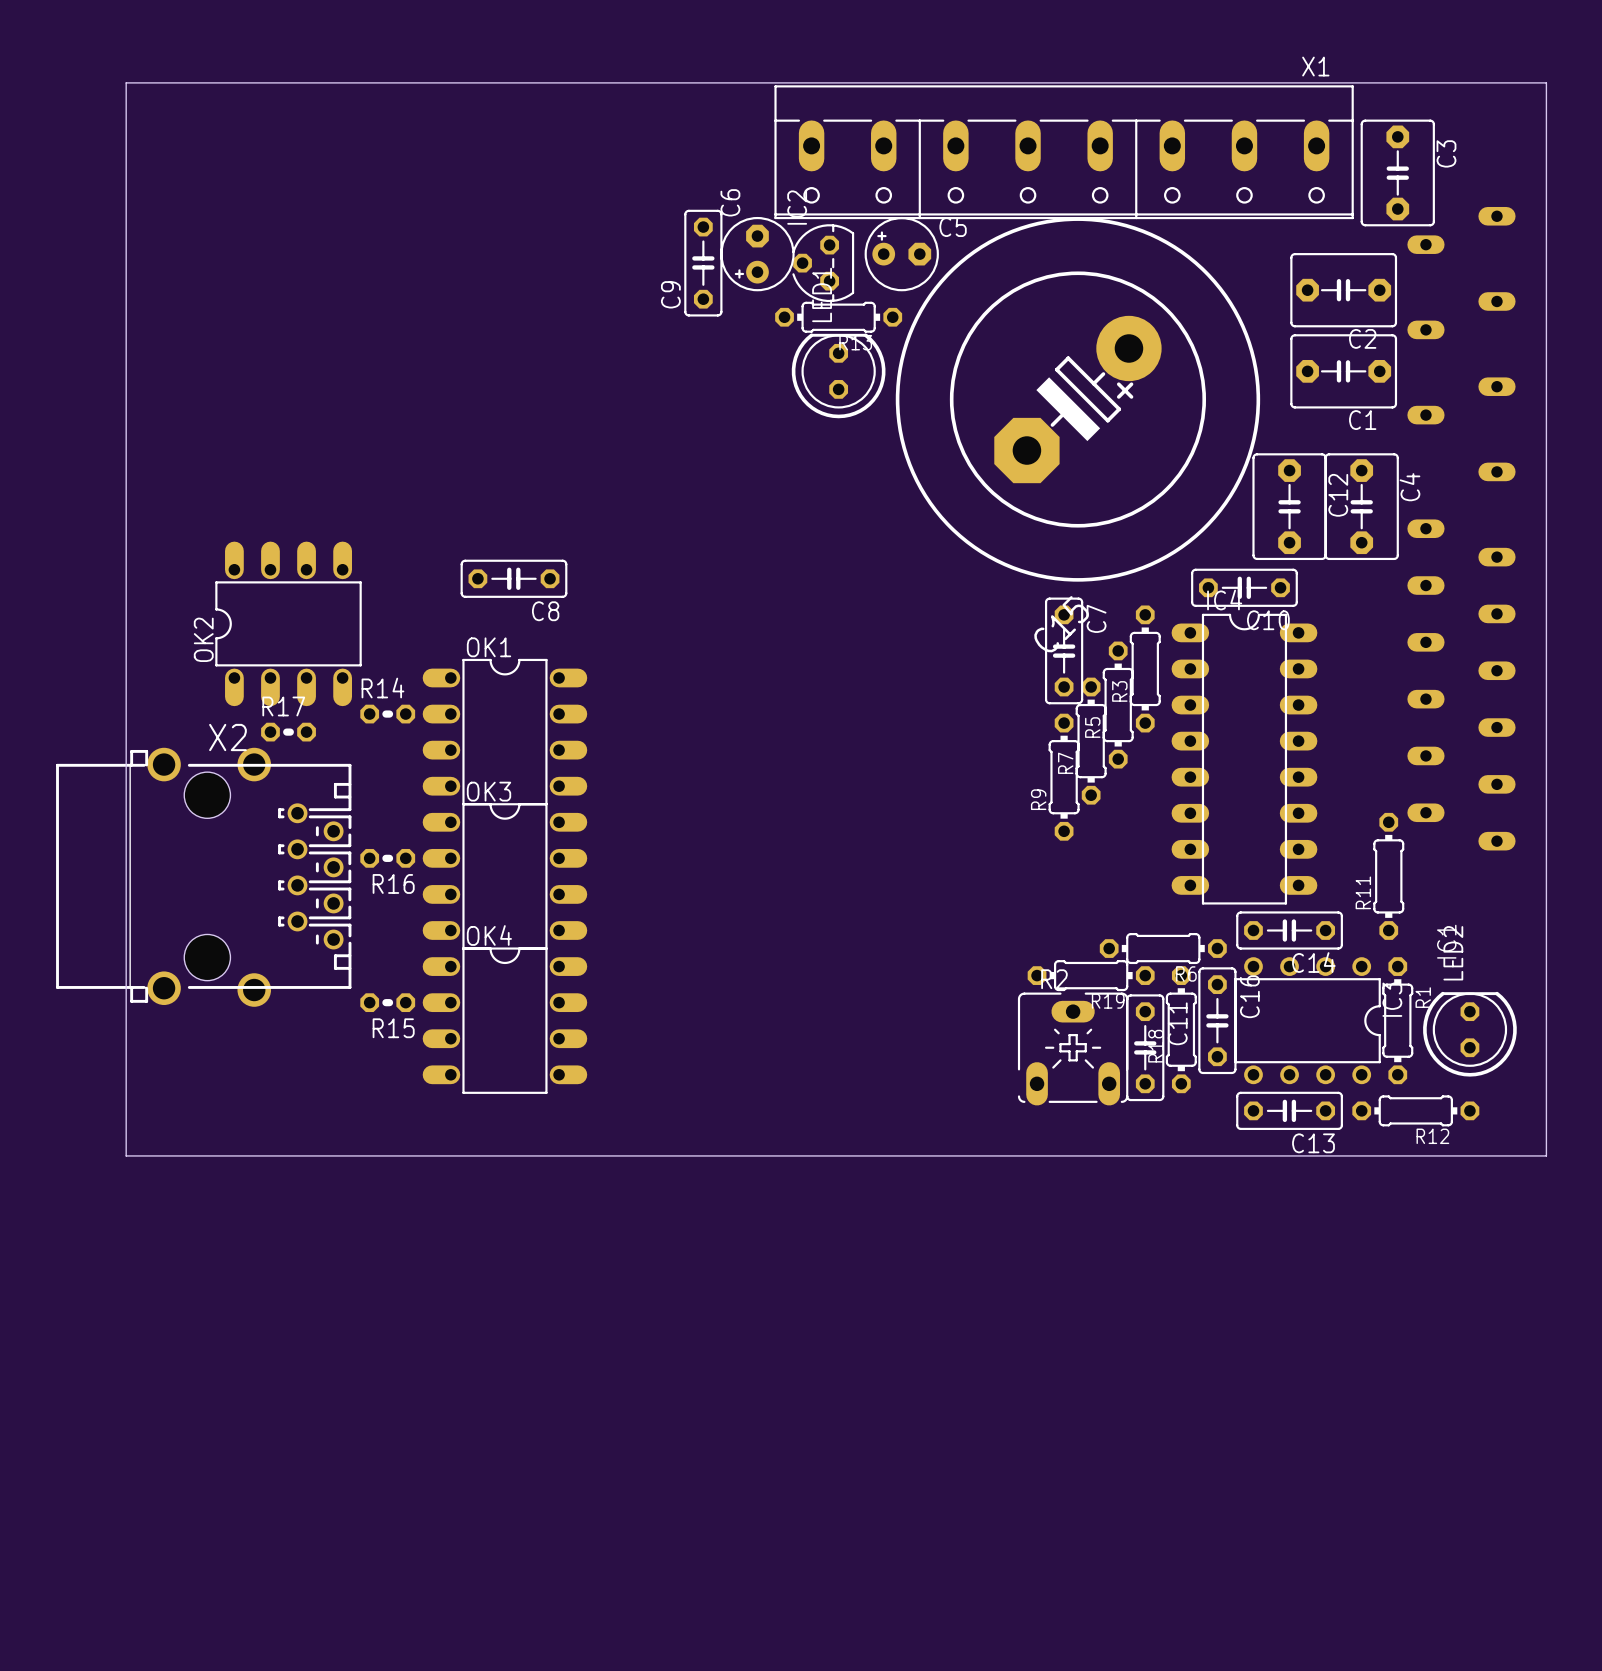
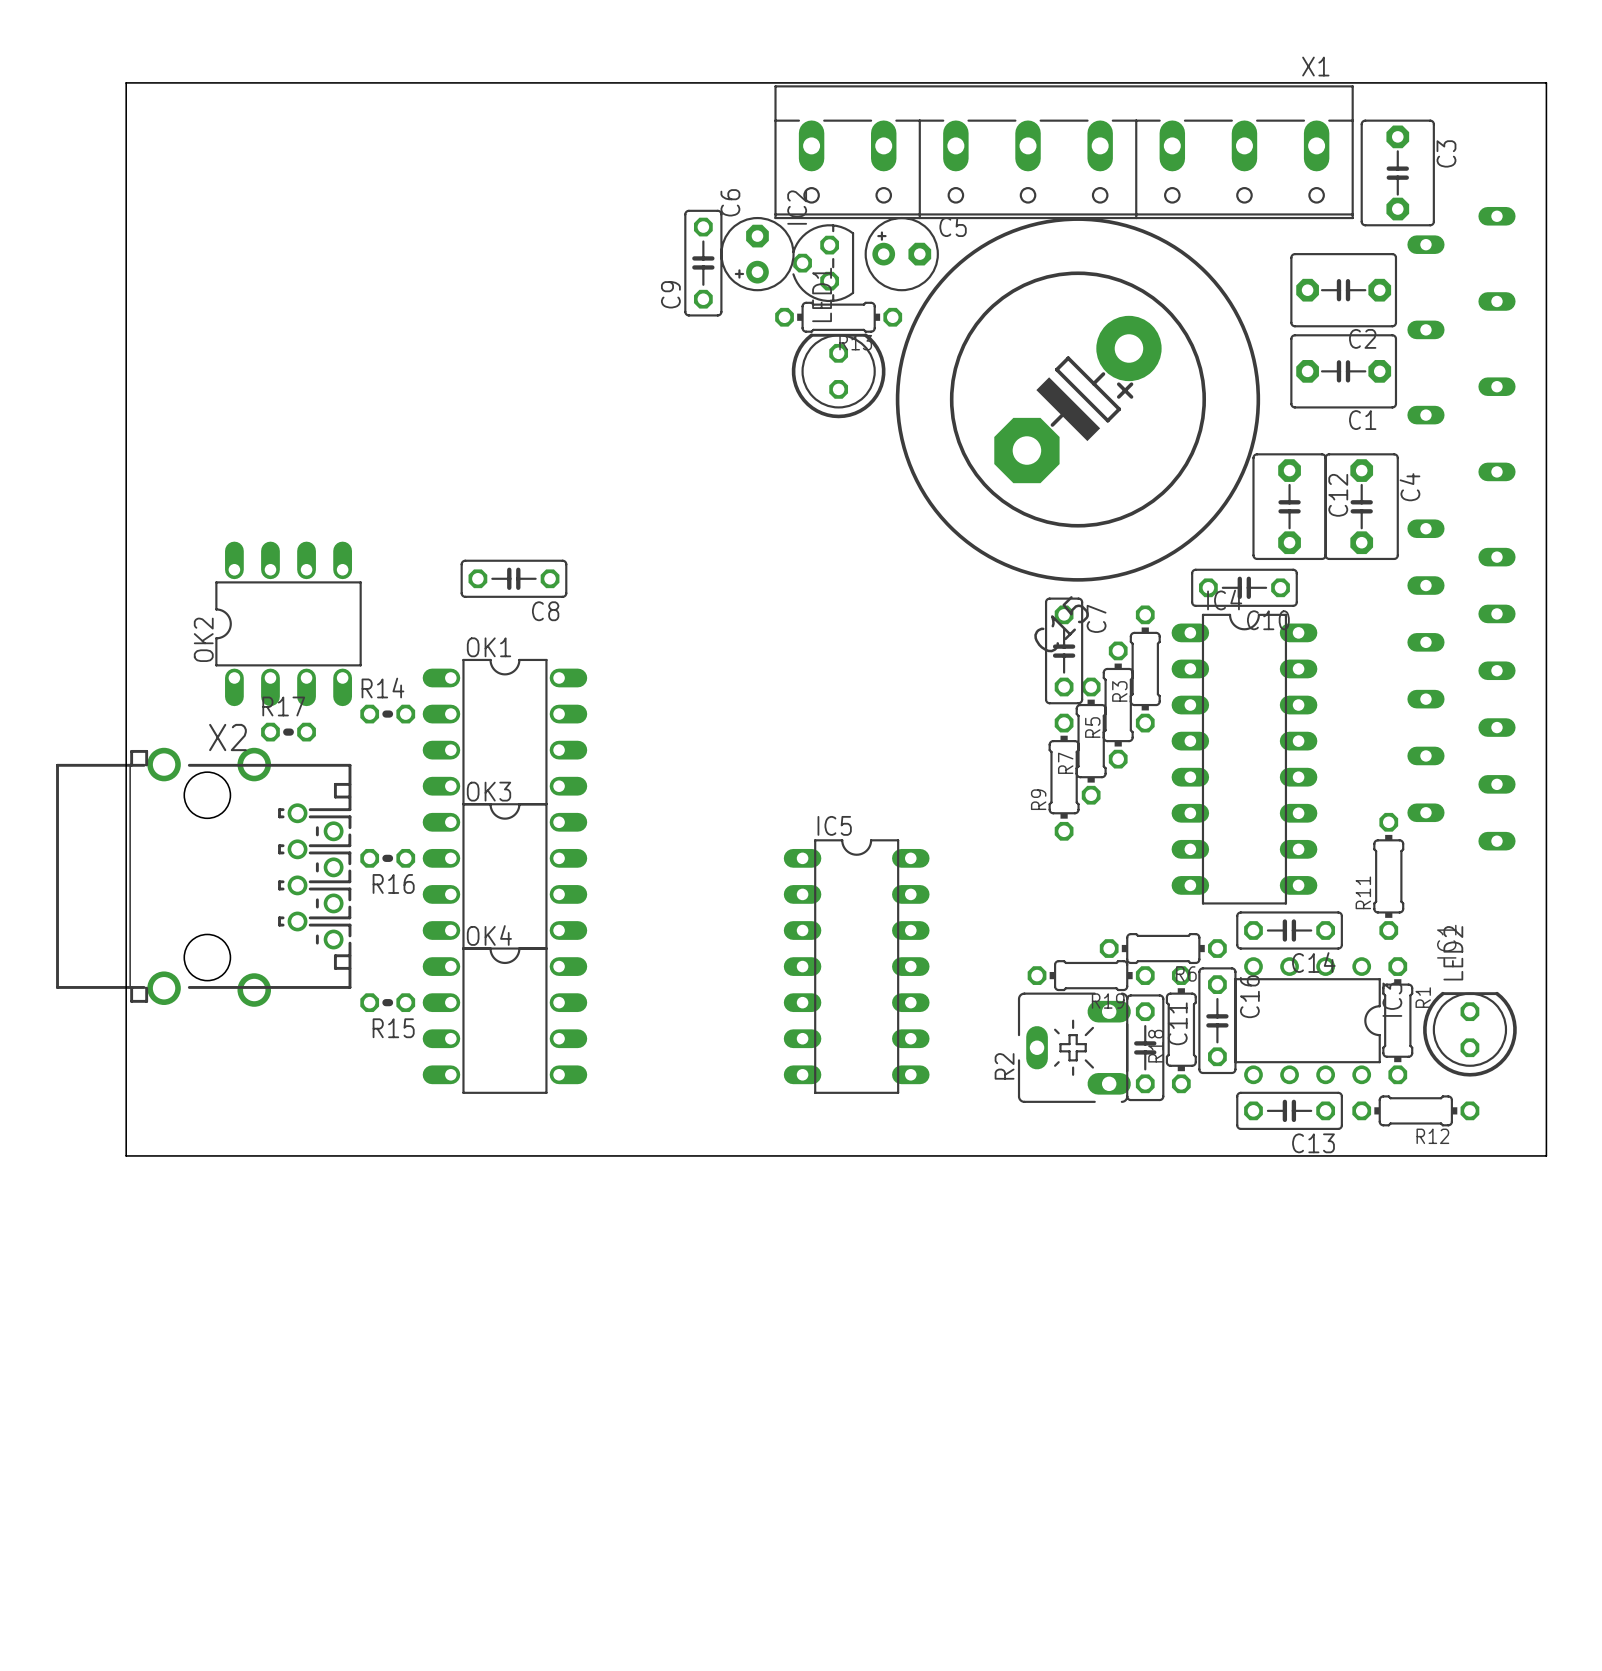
IC5: none -> (856, 966)
R2 rotation: 0° (1073, 1049) -> 90° counterclockwise (1074, 1047)

